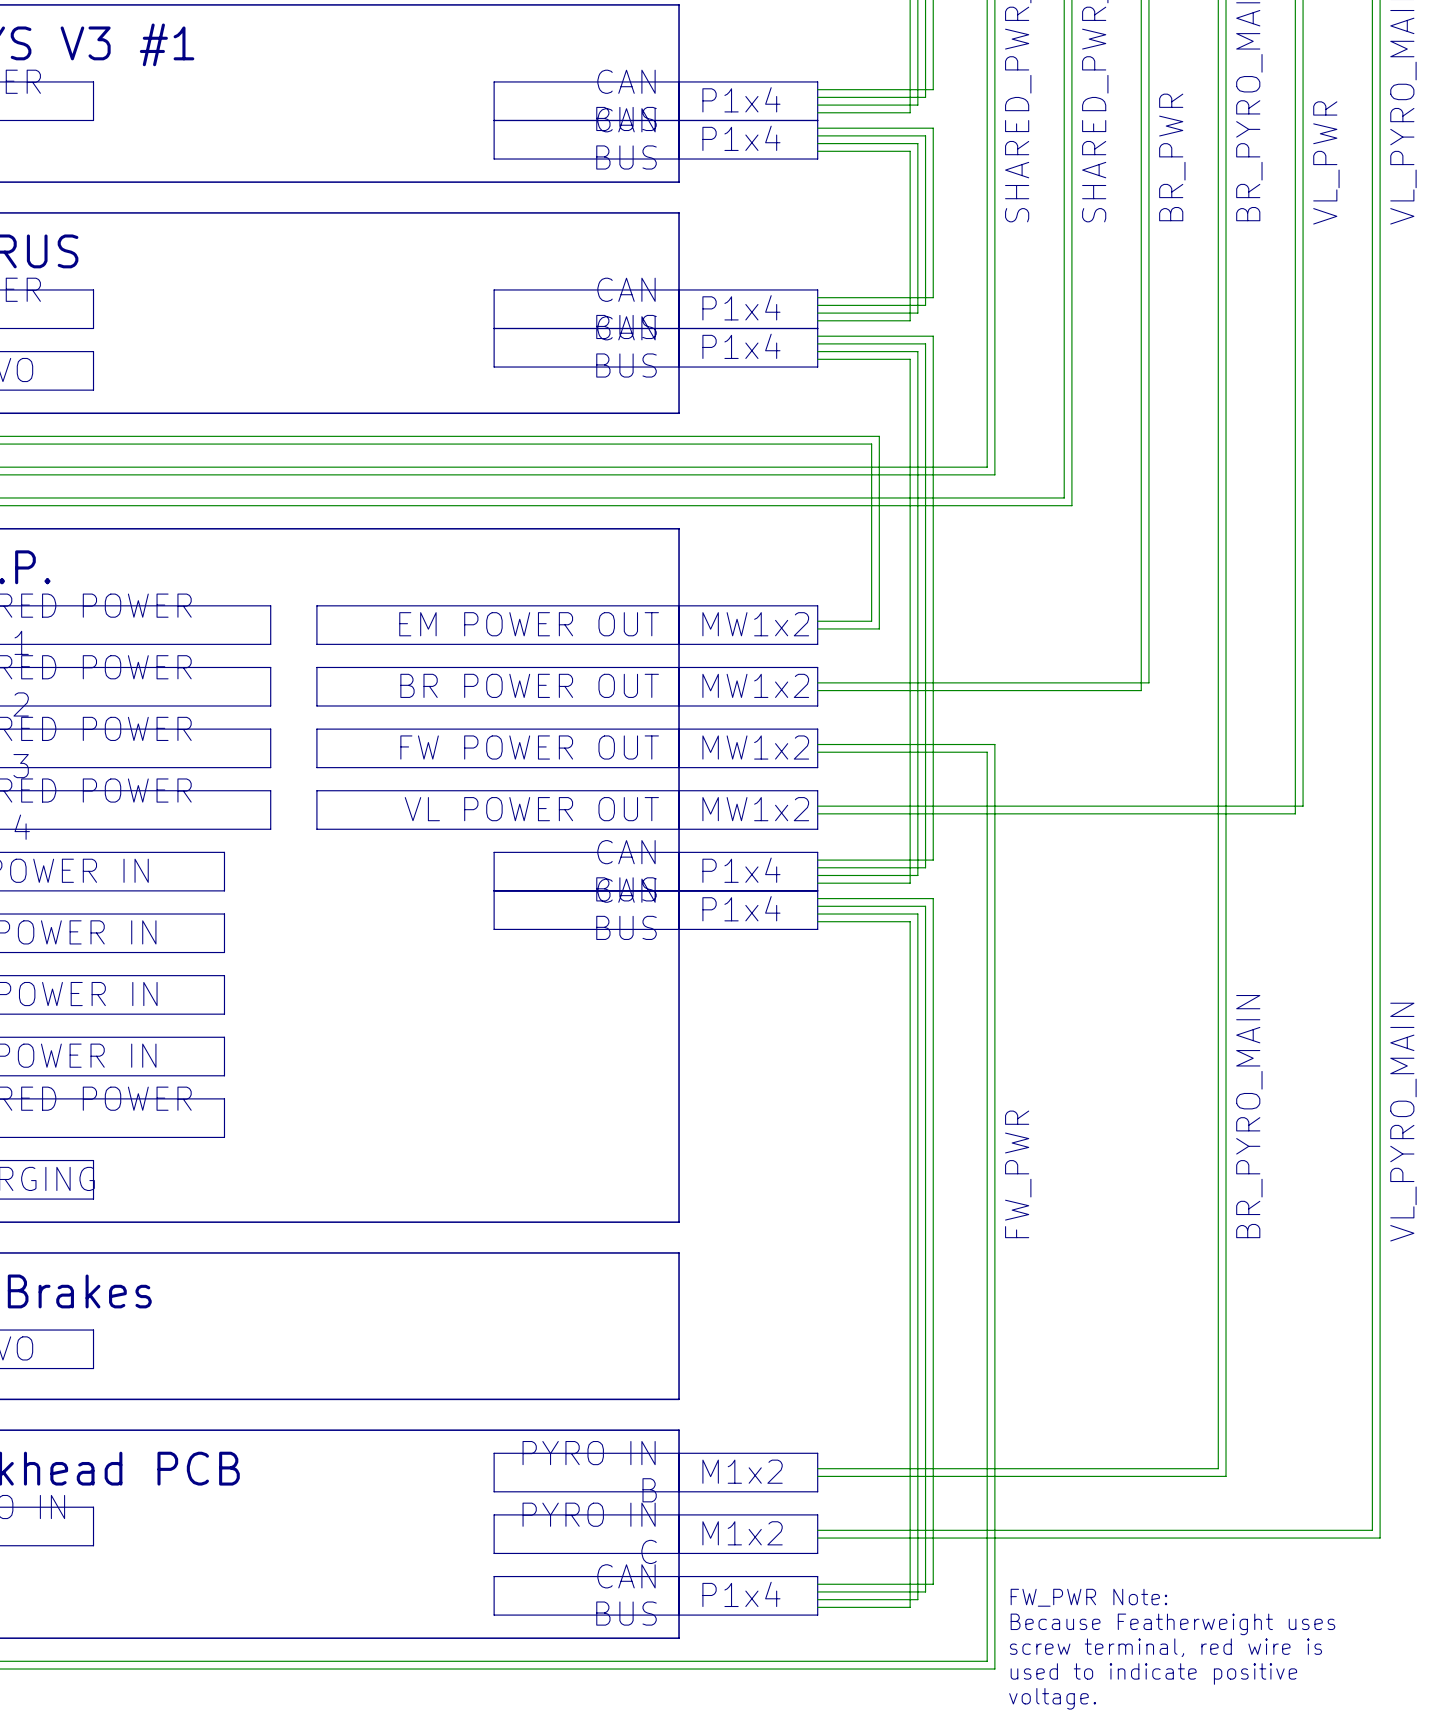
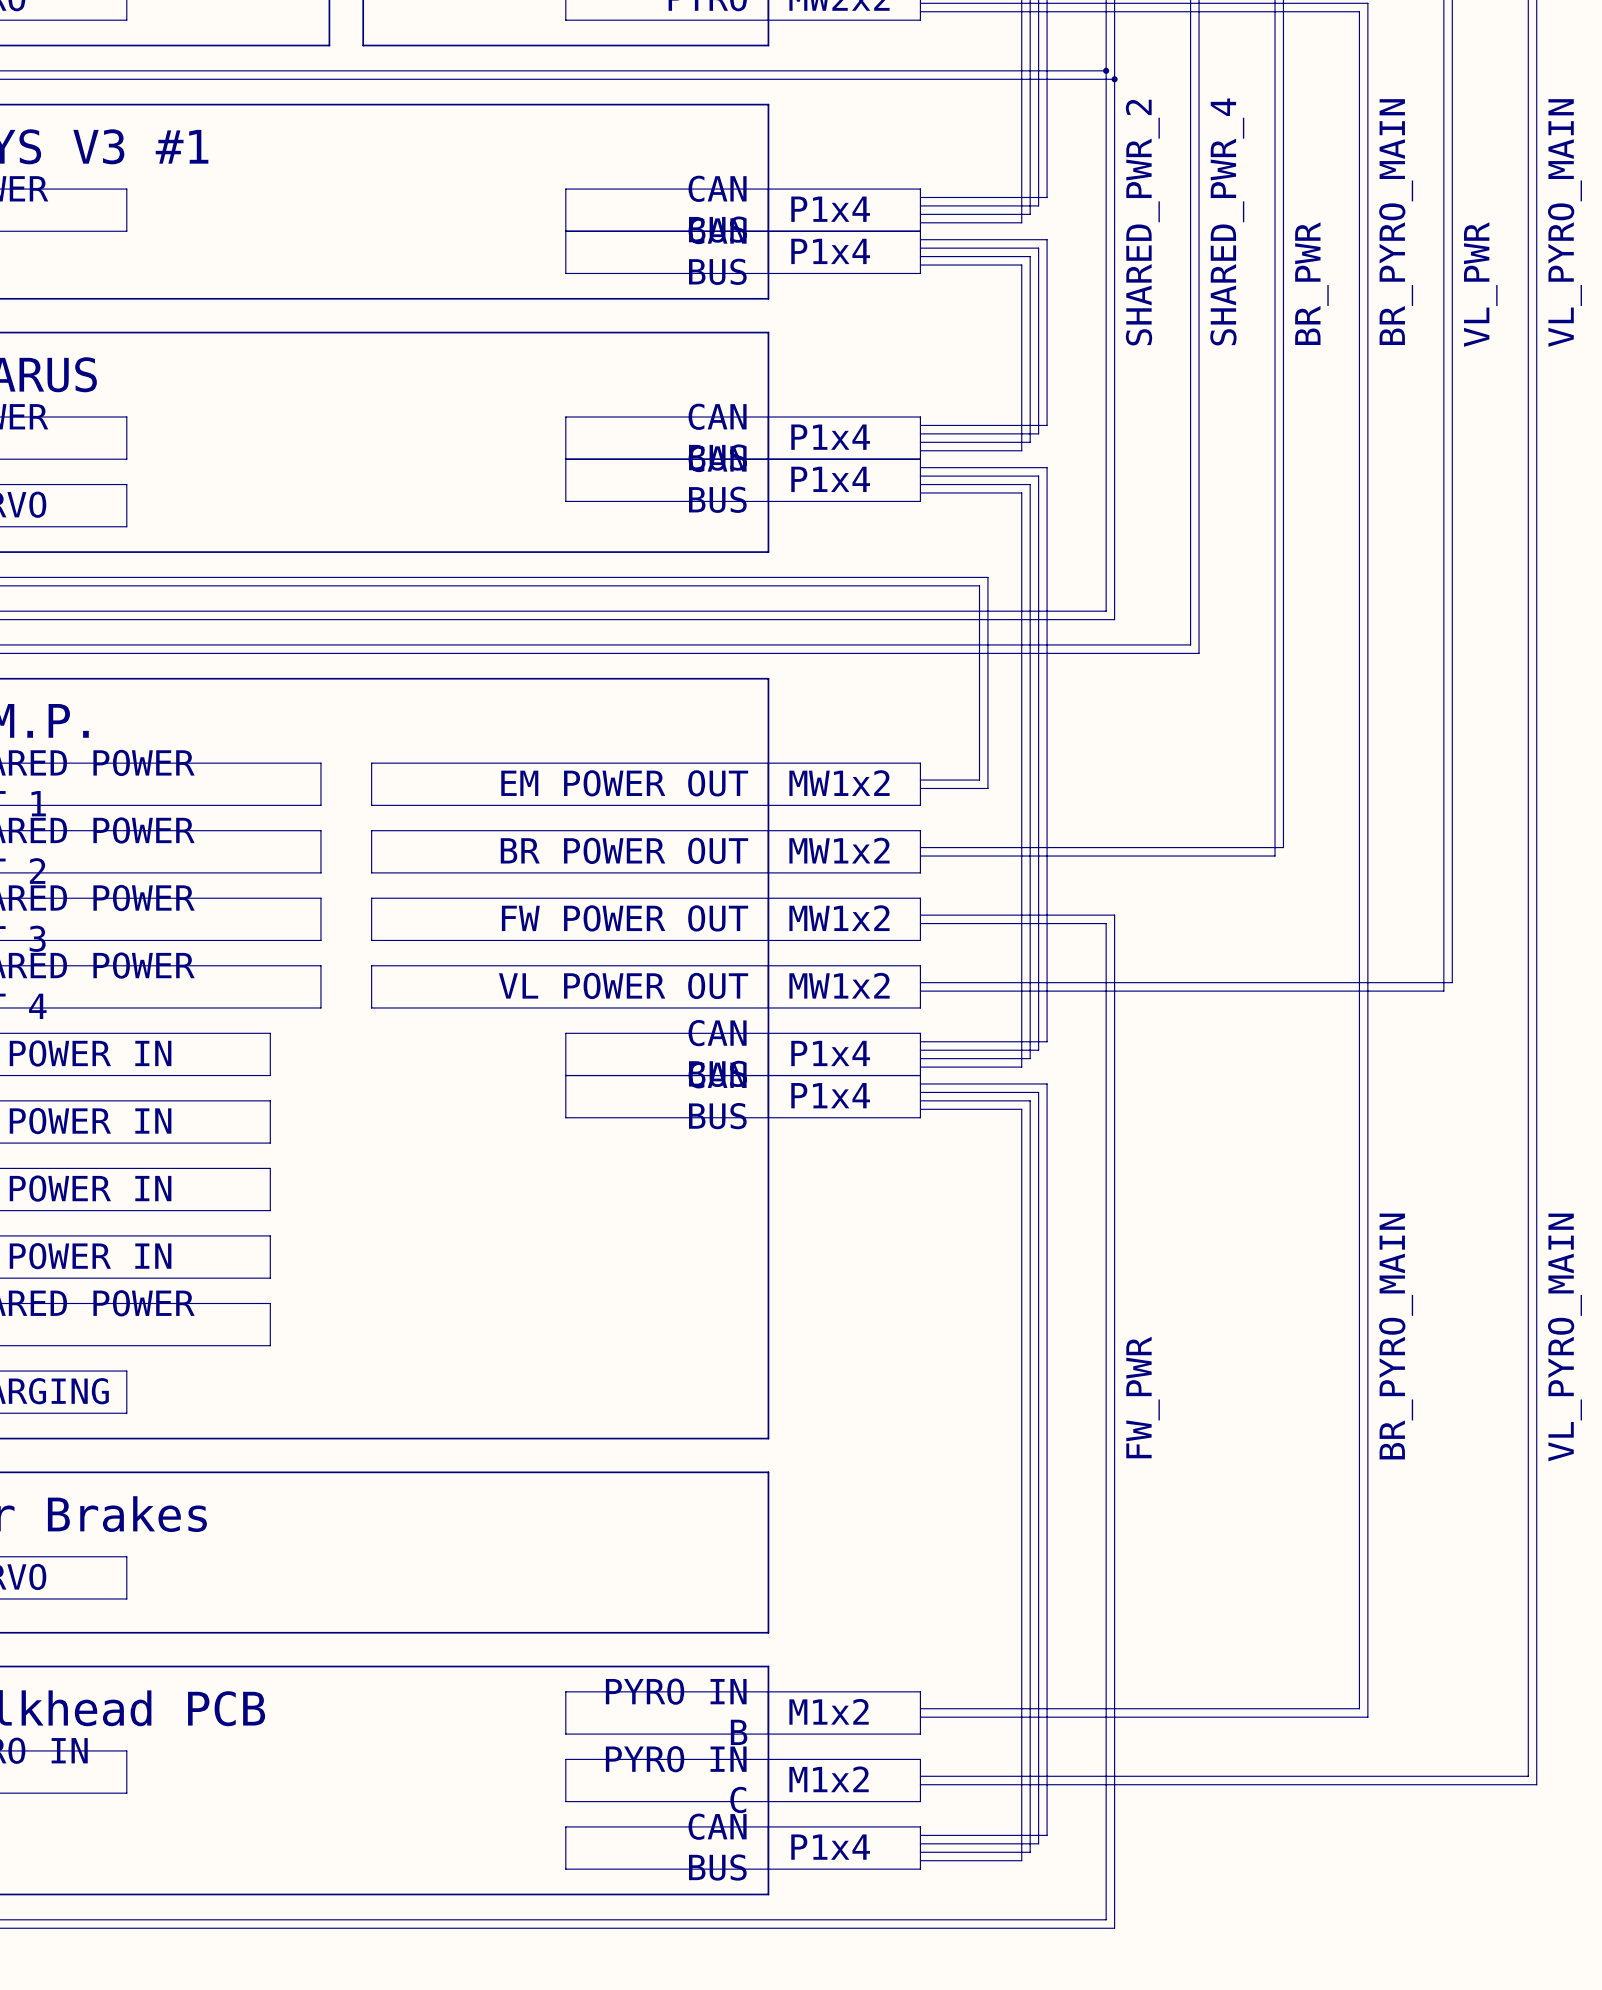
text: FW_PWR Note: (1088, 1597) -> none
text: Because Featherweight uses (1172, 1624) -> none
text: screw terminal, red wire is (1165, 1647) -> none
text: used to indicate positive (1153, 1673) -> none
text: voltage. (1052, 1698) -> none

